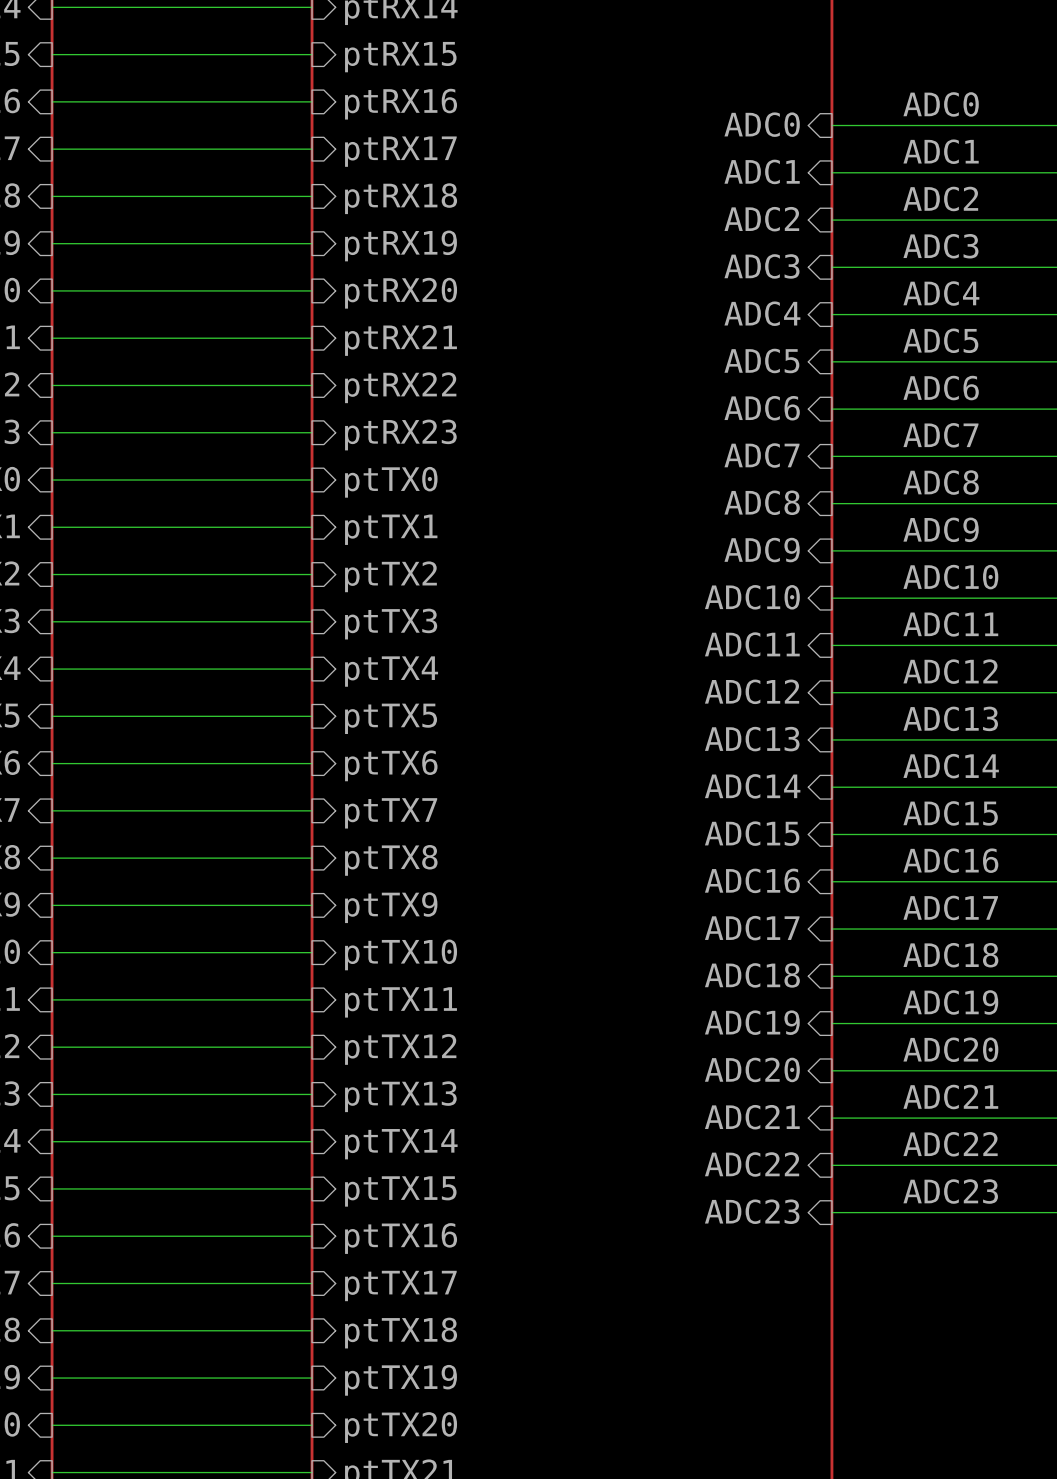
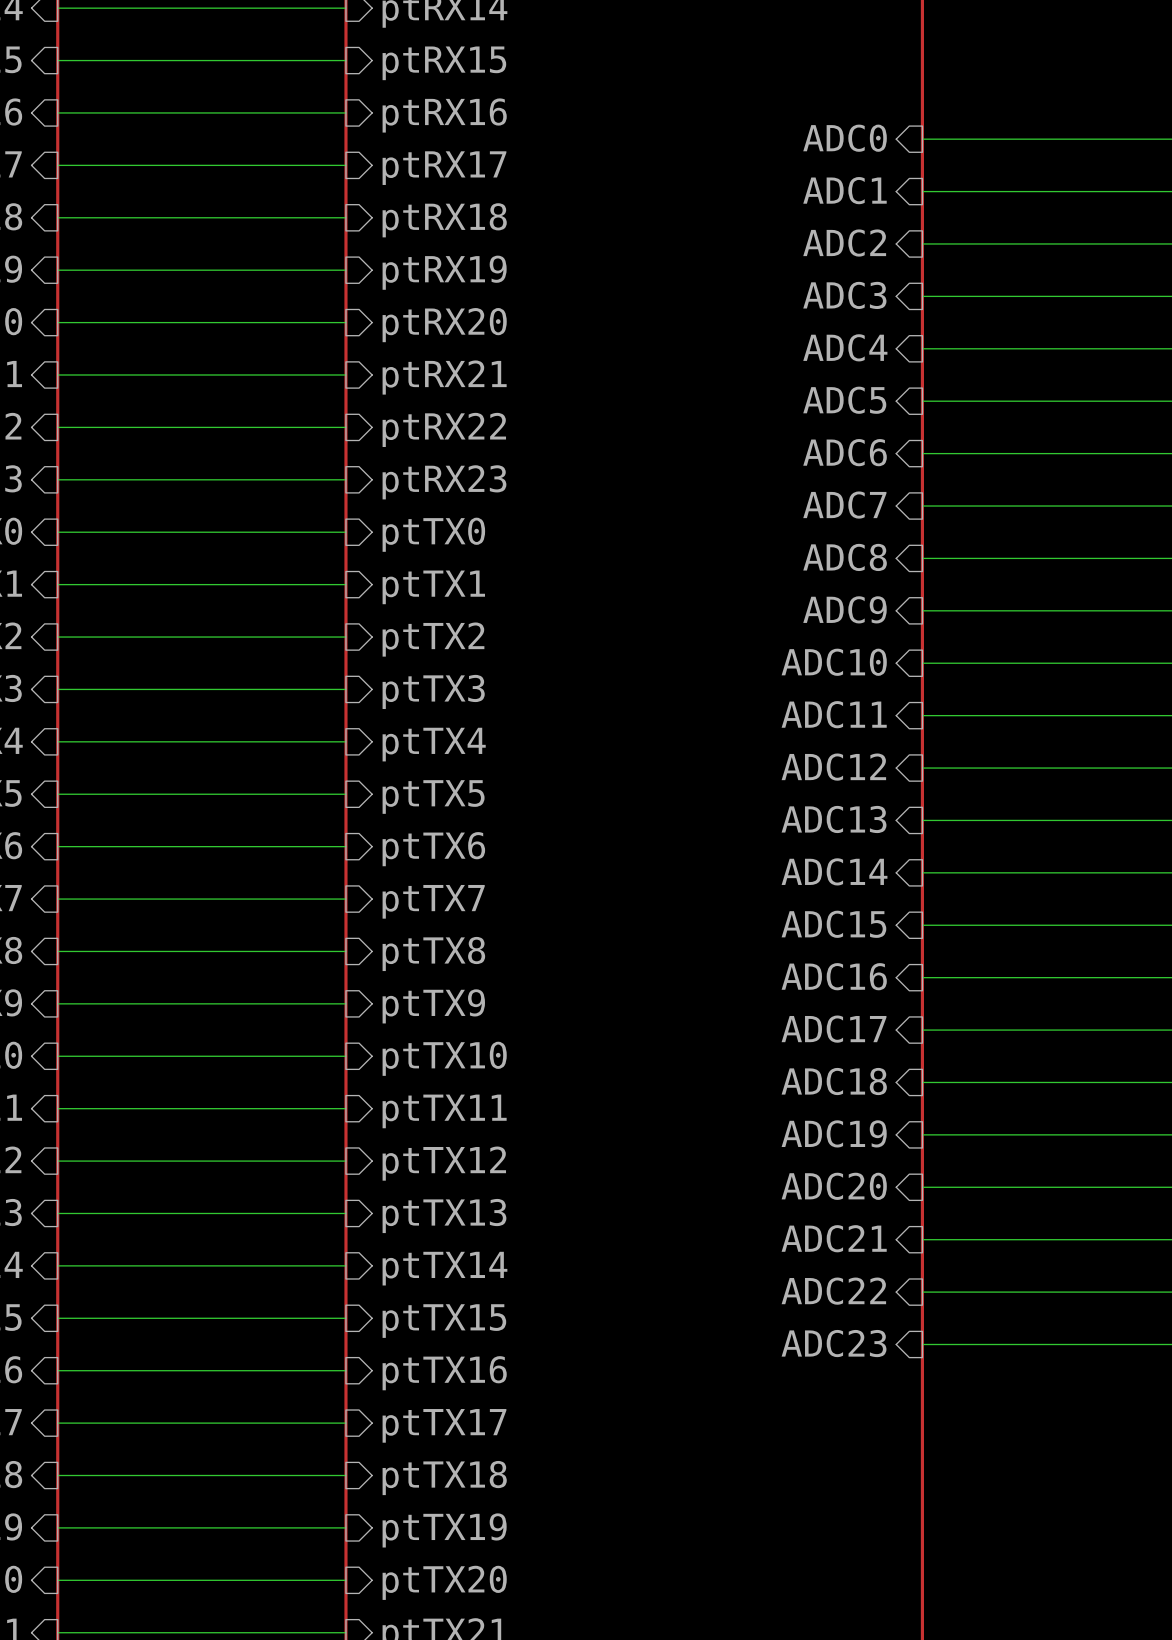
label: ADC0 (941, 104) -> none
label: ADC1 (941, 151) -> none
label: ADC2 (940, 198) -> none
label: ADC3 (940, 246) -> none
label: ADC4 (941, 293) -> none
label: ADC5 (940, 340) -> none
label: ADC6 (941, 388) -> none
label: ADC7 (940, 435) -> none
label: ADC8 (941, 482) -> none
label: ADC9 (941, 529) -> none
label: ADC10 (950, 577) -> none
label: ADC11 (950, 624) -> none
label: ADC12 (950, 671) -> none
label: ADC13 (950, 718) -> none
label: ADC14 (951, 766) -> none
label: ADC15 (950, 813) -> none
label: ADC16 (950, 860) -> none
label: ADC17 (950, 907) -> none
label: ADC18 (950, 955) -> none
label: ADC19 (950, 1002) -> none
label: ADC20 (950, 1049) -> none
label: ADC21 (950, 1097) -> none
label: ADC22 (950, 1144) -> none
label: ADC23 (950, 1191) -> none

